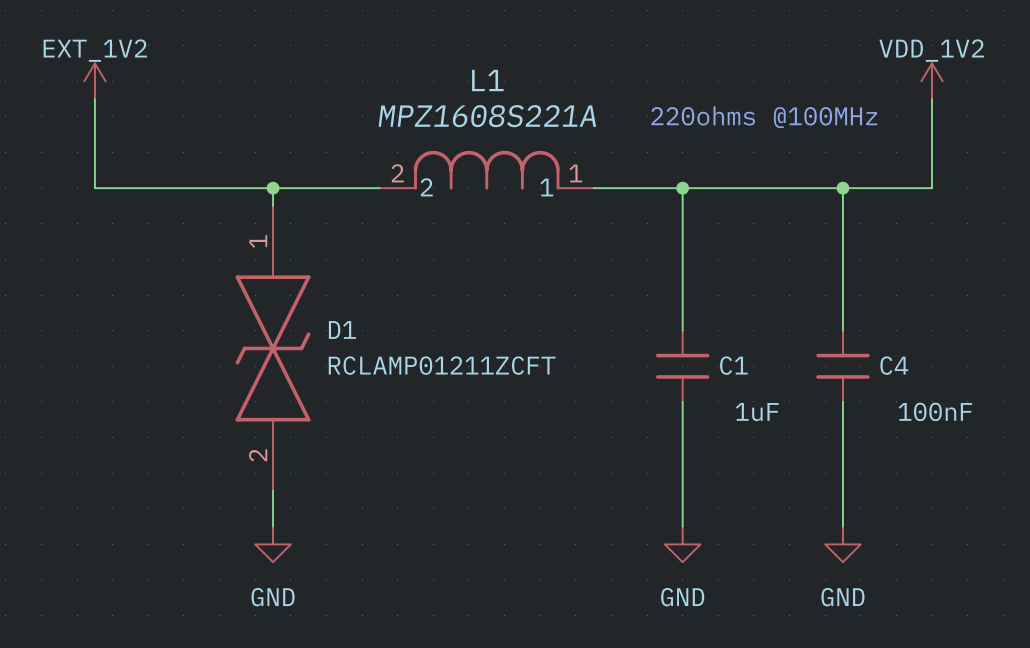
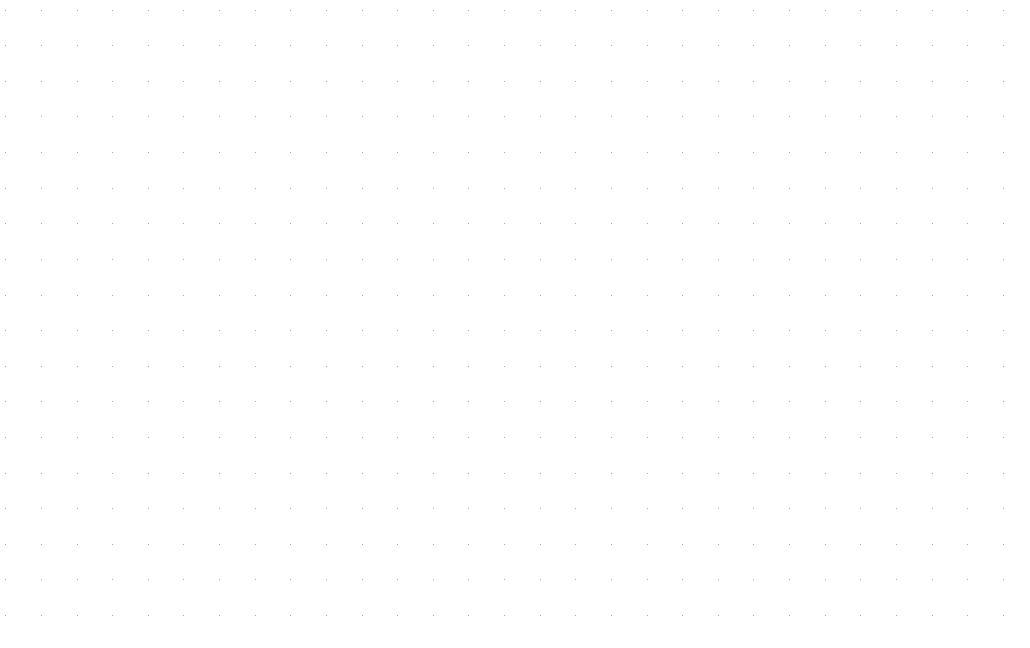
power symbol: EXT_1V2 (94, 81) -> none
power symbol: VDD_1V2 (932, 81) -> none
wire: (94, 99) (94, 188) (379, 188) -> none
wire: (932, 99) (932, 188) (593, 188) -> none
text: 220ohms @100MHz (764, 117) -> none
L1: MPZ1608S221A (486, 170) -> none
wire: (273, 188) (273, 205) -> none
junction: (273, 188) -> none
wire: (682, 188) (682, 330) -> none
junction: (682, 188) -> none
wire: (842, 188) (842, 330) -> none
junction: (842, 188) -> none
D1: RCLAMP01211ZCFT (273, 348) -> none
C1: 1uF (682, 366) -> none
C4: 100nF (842, 366) -> none
wire: (682, 401) (682, 526) -> none
wire: (842, 401) (842, 526) -> none
wire: (273, 490) (273, 526) -> none
power symbol: GND (273, 544) -> none
power symbol: GND (682, 544) -> none
power symbol: GND (842, 544) -> none

